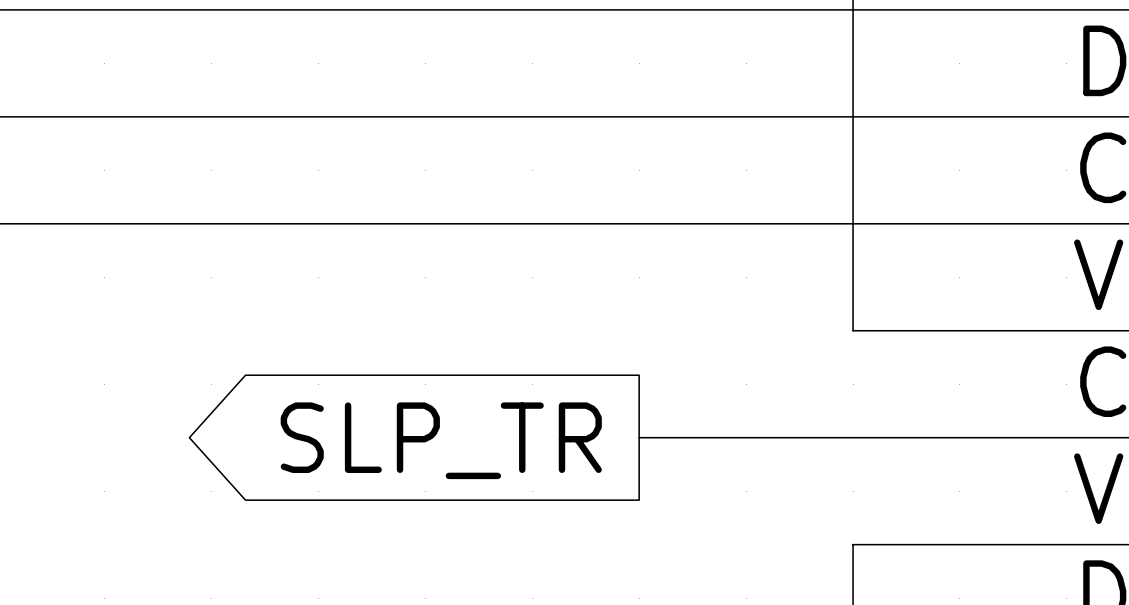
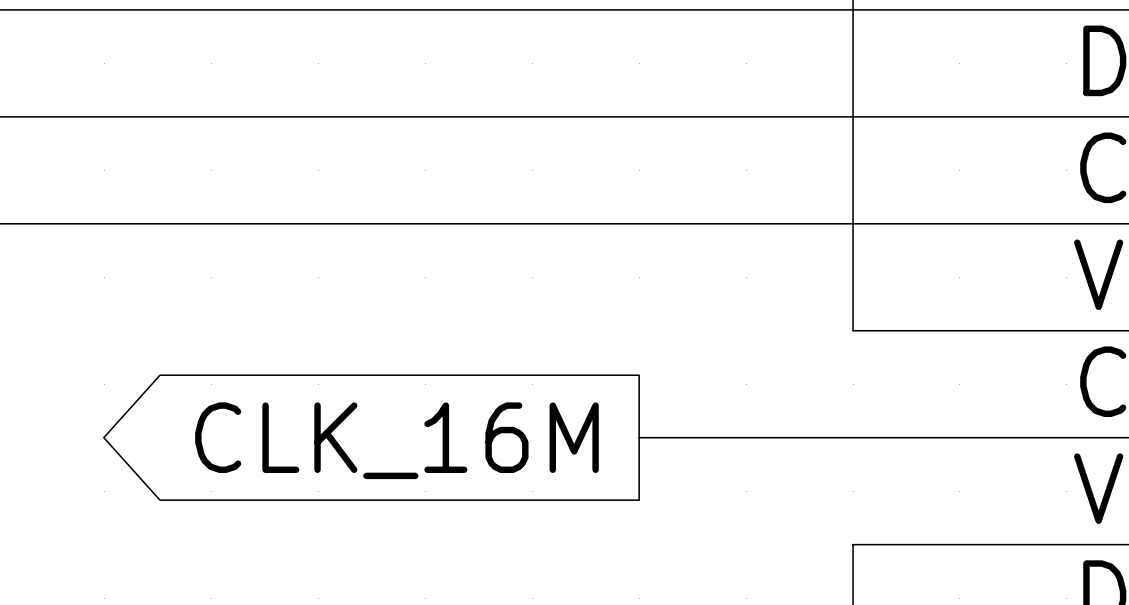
global label: SLP_TR (441, 440) -> CLK_16M (396, 440)

